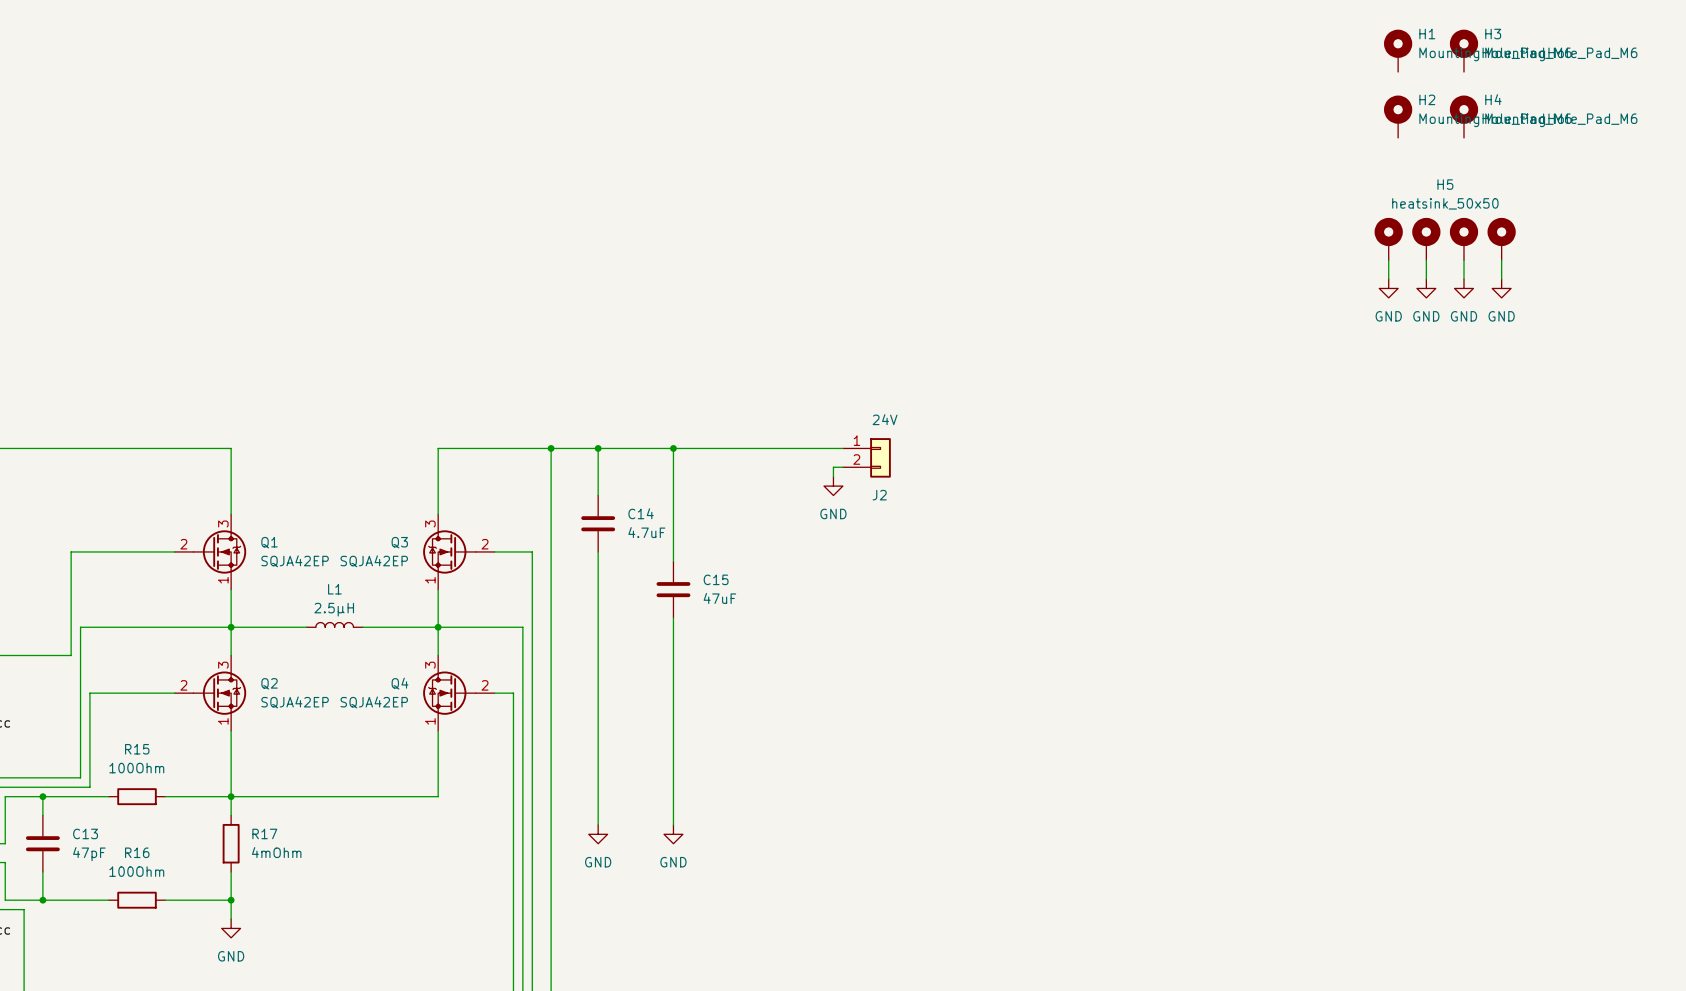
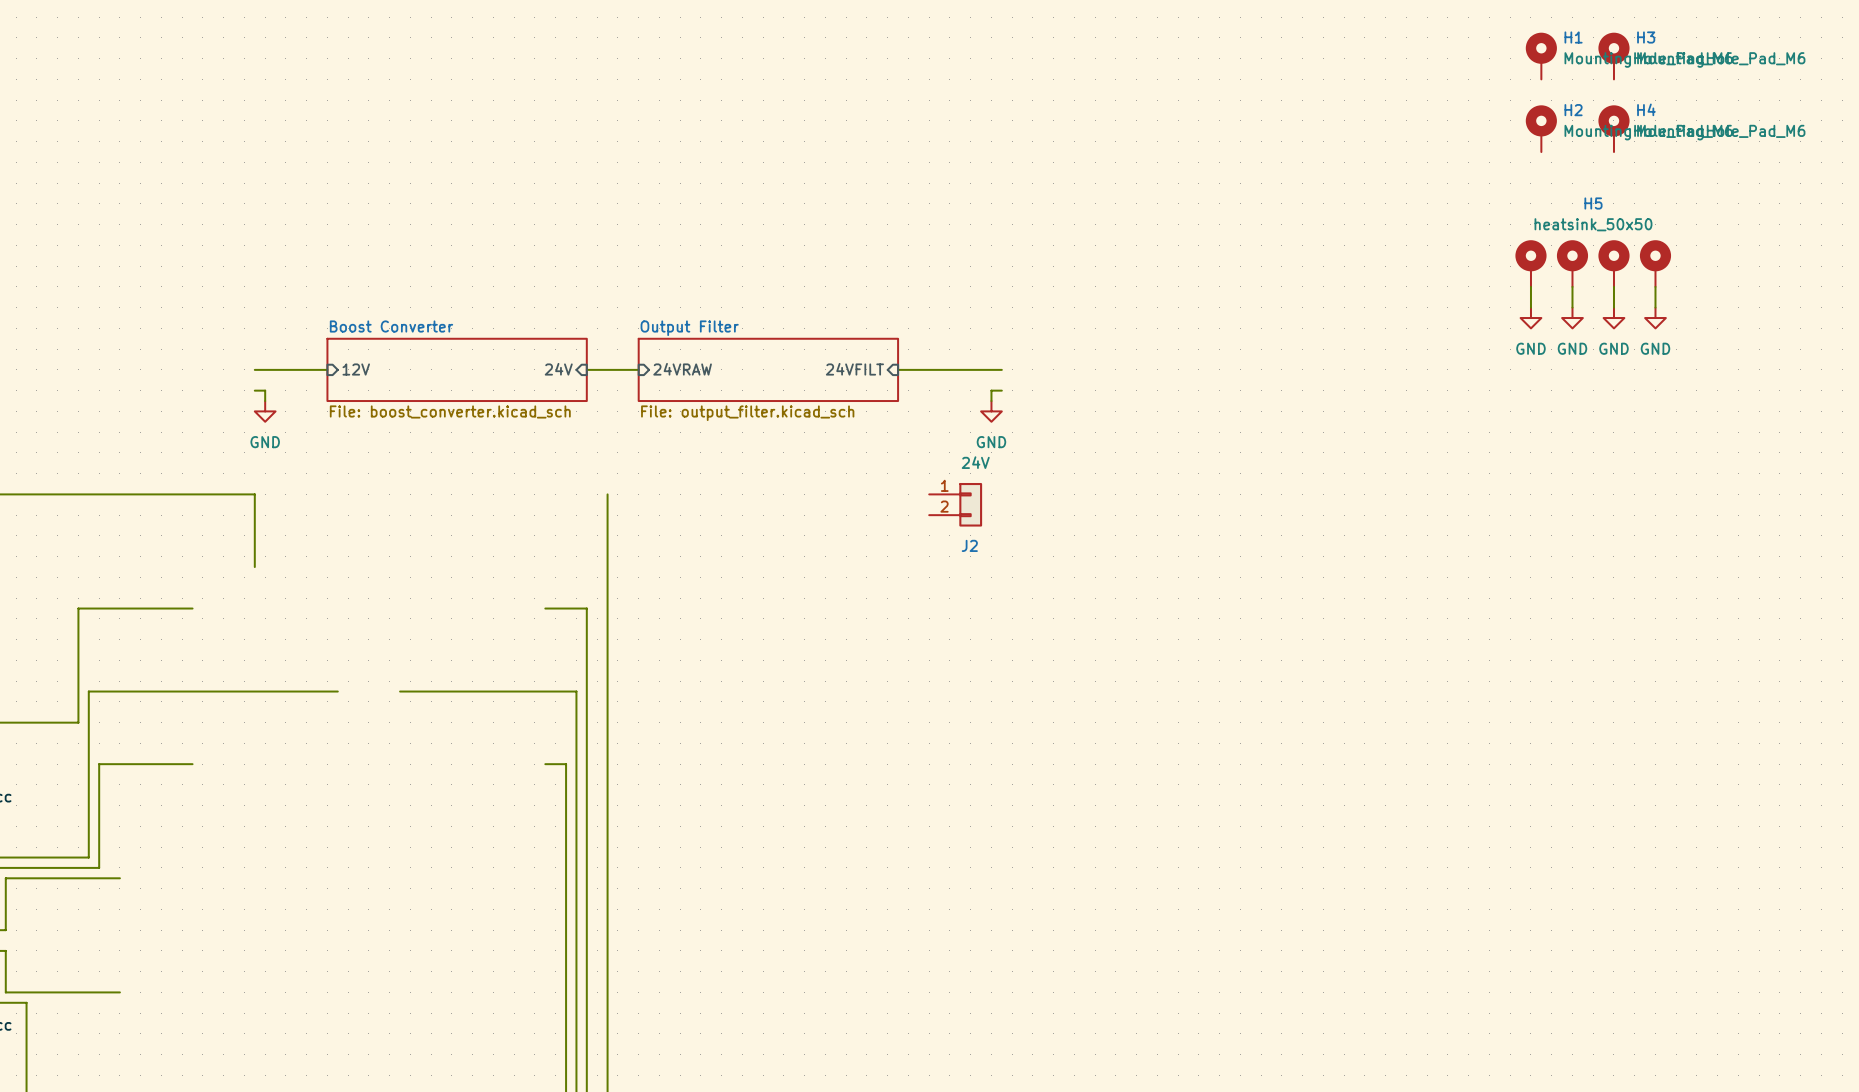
sheet pin: none -> 24V (558, 369)
sheet pin: none -> 24VRAW (682, 369)
sheet pin: none -> 24VFILT (854, 369)
wire: none -> (254, 369) (327, 369)
sheet pin: none -> 12V (356, 369)
sheet Boost Converter: none -> File: boost_converter.kicad_sch (457, 369)
wire: none -> (586, 369) (638, 369)
sheet Output Filter: none -> File: output_filter.kicad_sch (768, 369)
wire: none -> (898, 369) (1001, 369)
wire: none -> (254, 390) (265, 390) (265, 401)
power symbol: none -> GND (265, 411)
junction: (551, 448) -> none
wire: (598, 448) (598, 495) -> none
junction: (598, 448) -> none
wire: (673, 448) (673, 561) -> none
junction: (673, 448) -> none
wire: (842, 448) (438, 448) (438, 514) -> none
wire: (842, 467) (833, 467) (833, 476) -> (1001, 390) (991, 390) (991, 401)
power symbol position: GND (833, 486) -> GND (991, 411)
C14: 4.7uF (598, 523) -> none
Q1: SQJA42EP (210, 551) -> none
Q3: SQJA42EP (458, 551) -> none
wire: (598, 551) (598, 824) -> none
wire: (231, 589) (231, 655) -> none
wire: (438, 589) (438, 655) -> none
C15: 47uF (673, 589) -> none
wire: (673, 617) (673, 824) -> none
L1: 2.5µH (334, 624) -> none
junction: (231, 627) -> none
junction: (438, 627) -> none
Q2: SQJA42EP (210, 693) -> none
Q4: SQJA42EP (458, 693) -> none
wire: (231, 730) (231, 815) -> none
wire: (438, 730) (438, 796) (165, 796) -> none
wire: (42, 796) (42, 815) -> none
junction: (42, 796) -> none
R15: 100Ohm (137, 796) -> none
junction: (231, 796) -> none
power symbol: GND (598, 834) -> none
power symbol: GND (673, 834) -> none
C13: 47pF (42, 843) -> none
R17: 4mOhm (231, 843) -> none
wire: (42, 871) (42, 900) -> none
wire: (231, 871) (231, 919) -> none
junction: (42, 900) -> none
R16: 100Ohm (137, 900) -> none
wire: (165, 900) (231, 900) -> none
junction: (231, 900) -> none
power symbol: GND (231, 928) -> none

